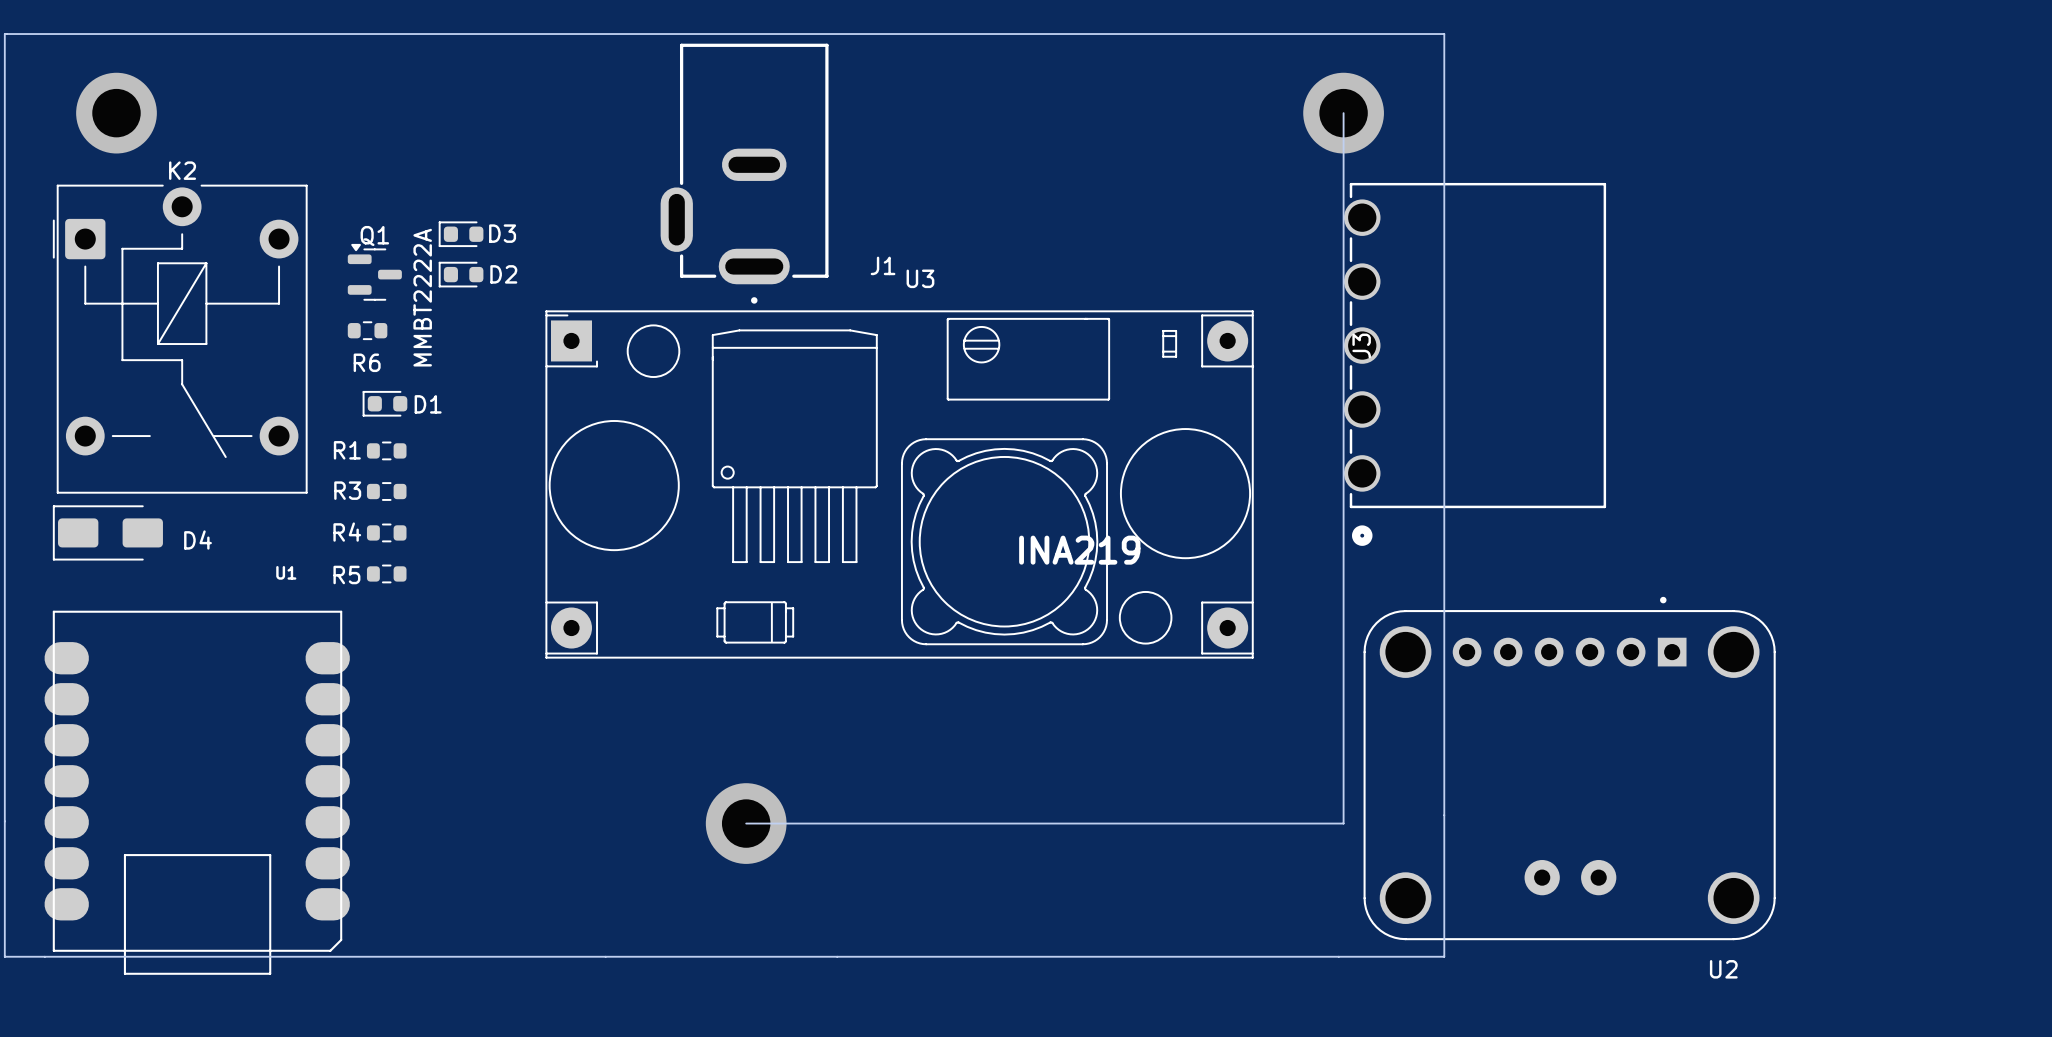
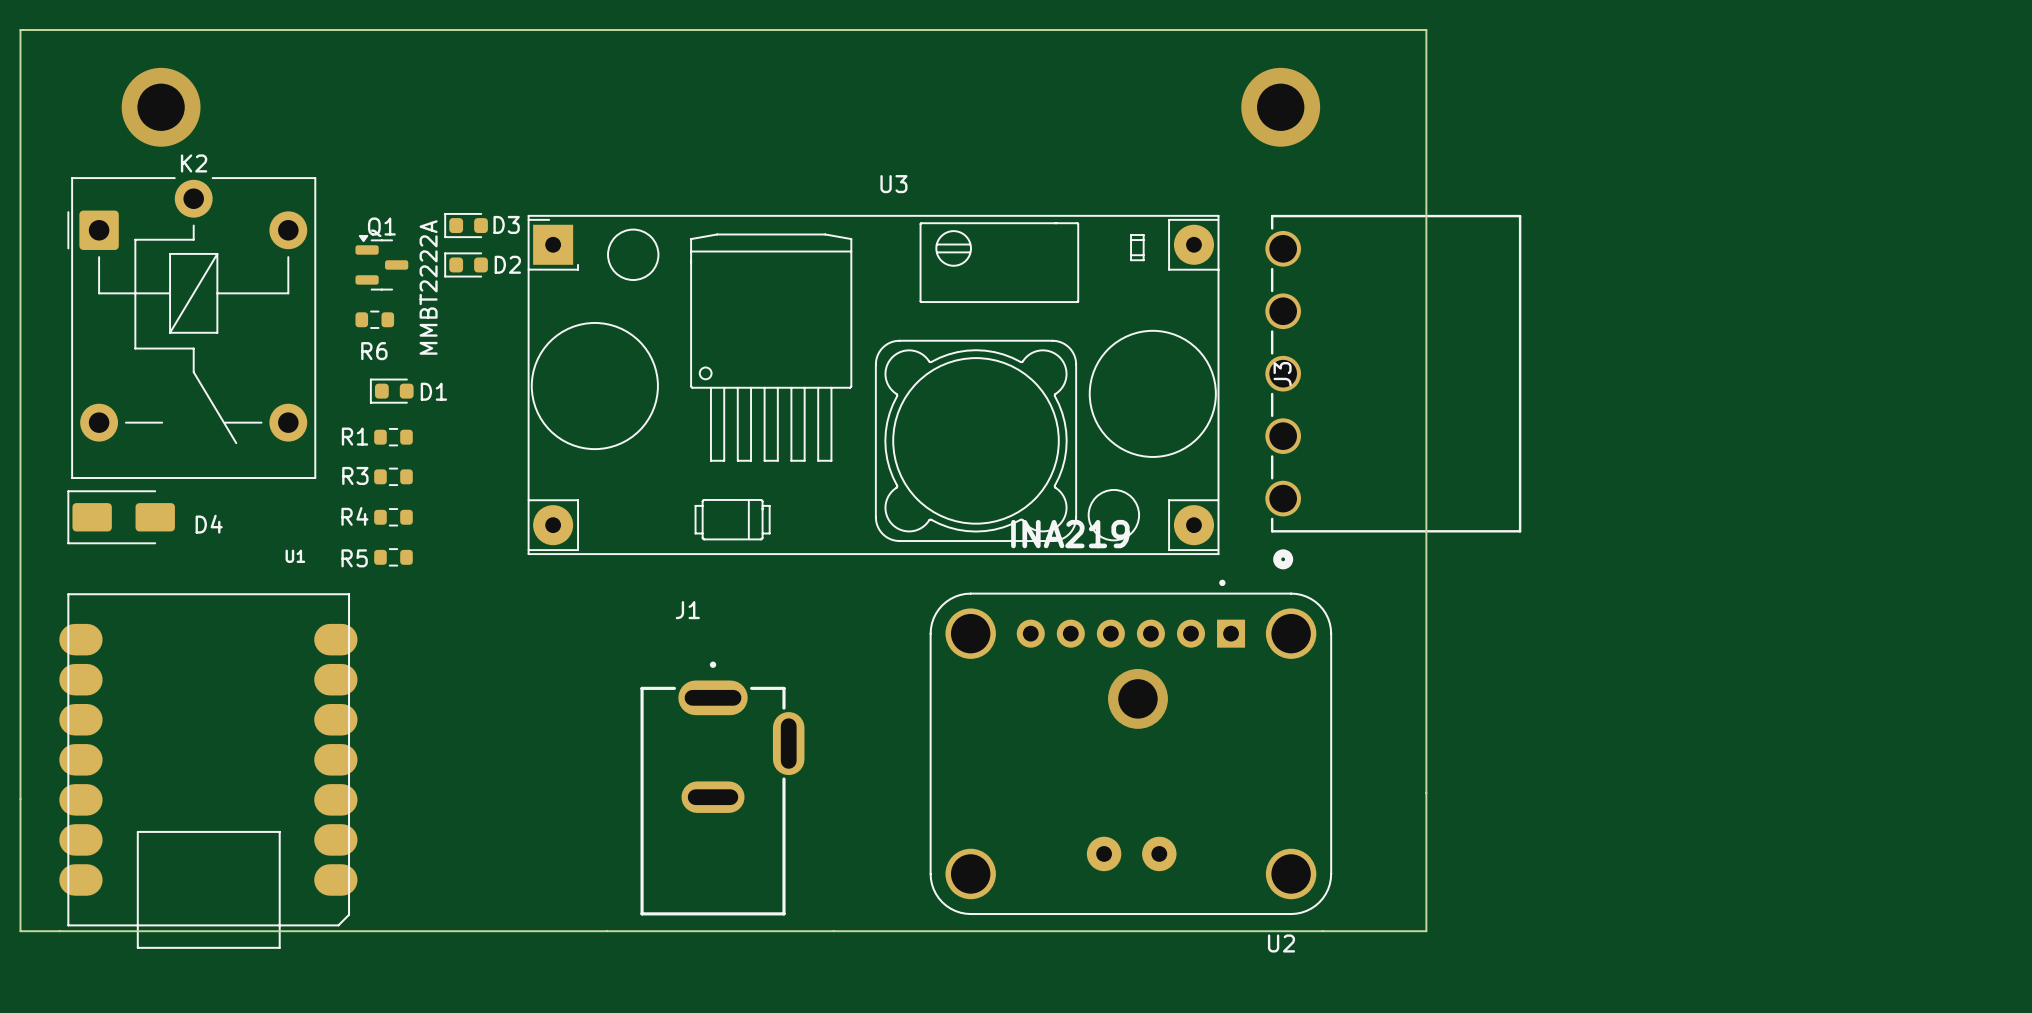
via position: (116, 113) -> (161, 107)
board edge: (1343, 113) (1343, 823) (746, 823) -> none
via position: (1343, 113) -> (1280, 107)
J1 rotation: 0° (744, 173) -> 180° (722, 788)
J1 position: (744, 173) -> (722, 788)
J1 name position: J1 (883, 265) -> J1 (687, 610)
J3 position: (1475, 364) -> (1393, 392)
U3 position: (899, 484) -> (873, 384)
via: none -> (1137, 698)
U2 position: (1569, 768) -> (1130, 747)
via: (746, 823) -> none

